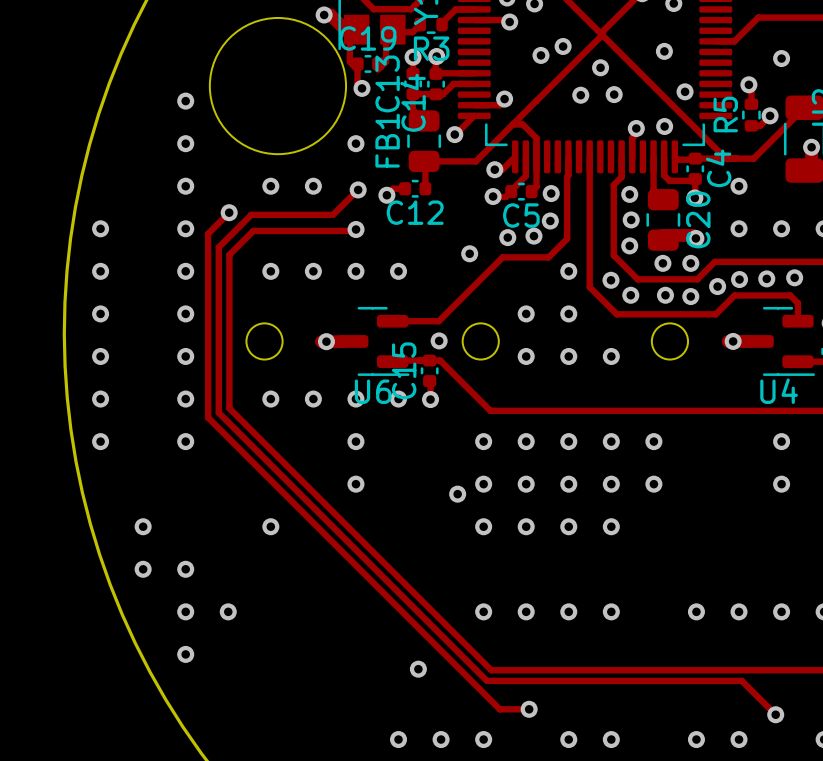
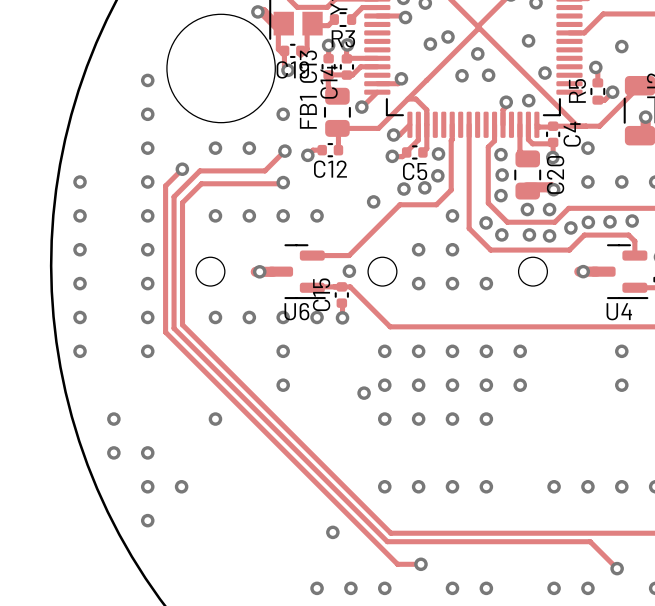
C19 name position: C19 (367, 38) -> C19 (292, 69)

